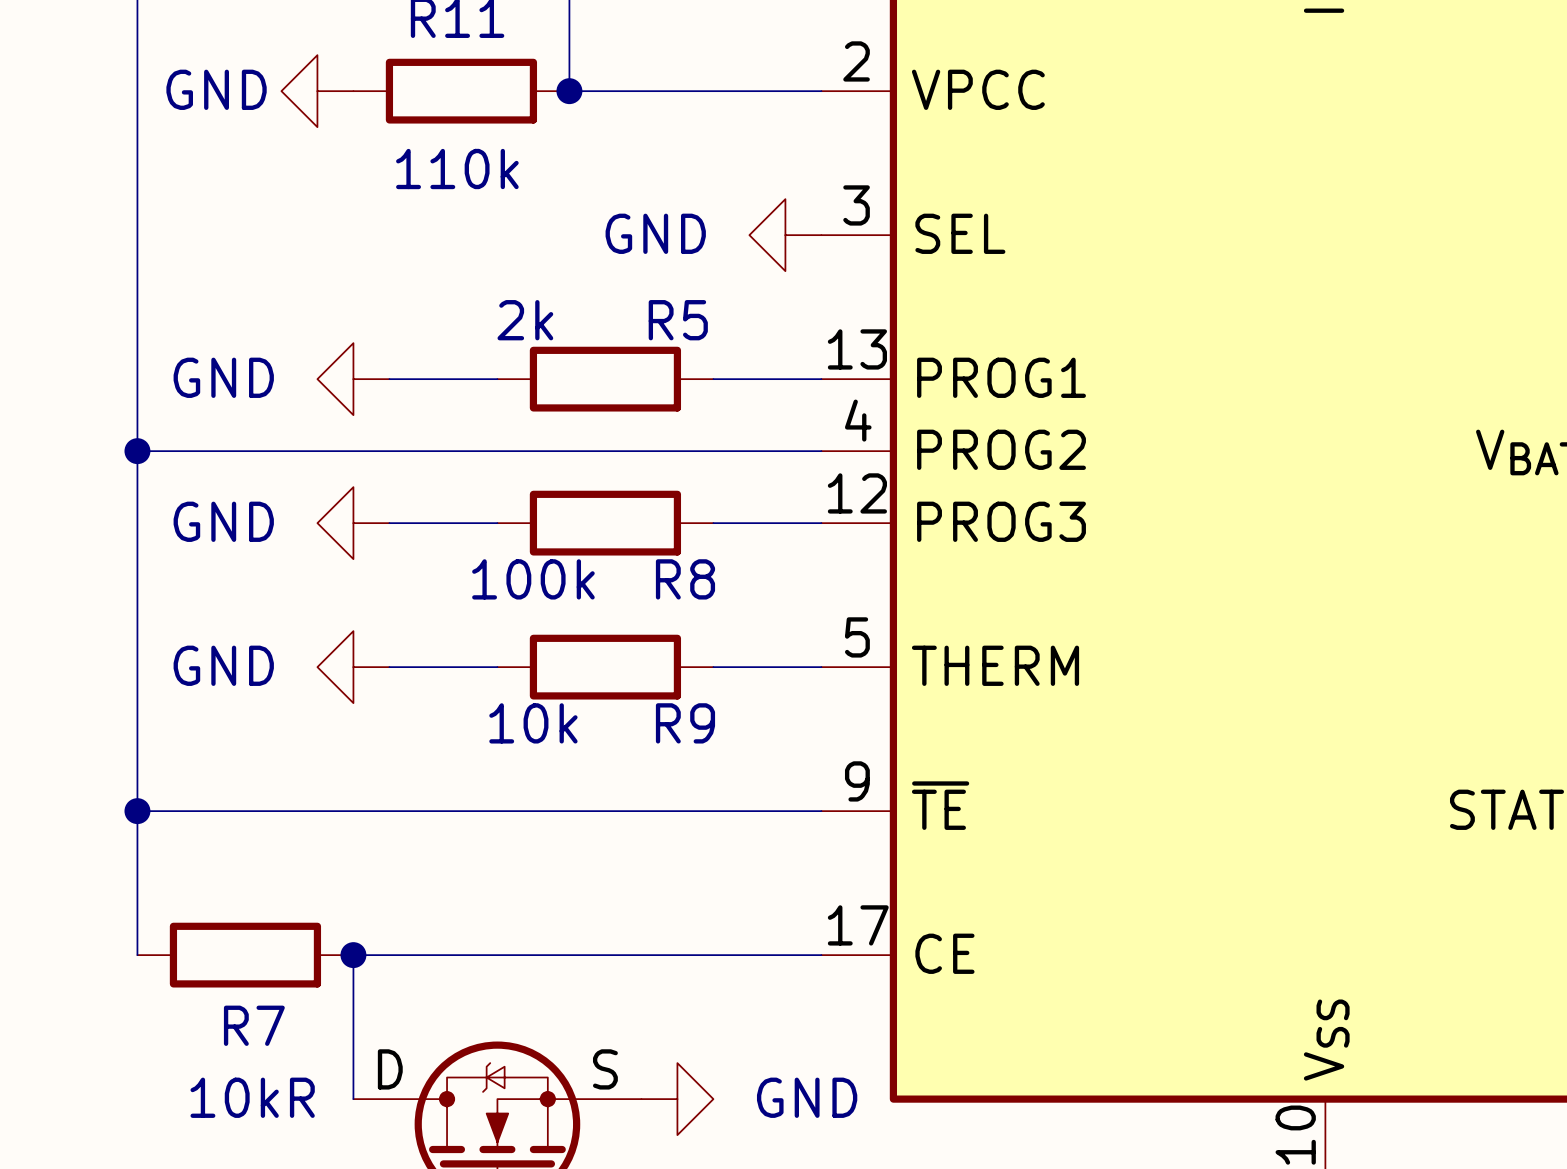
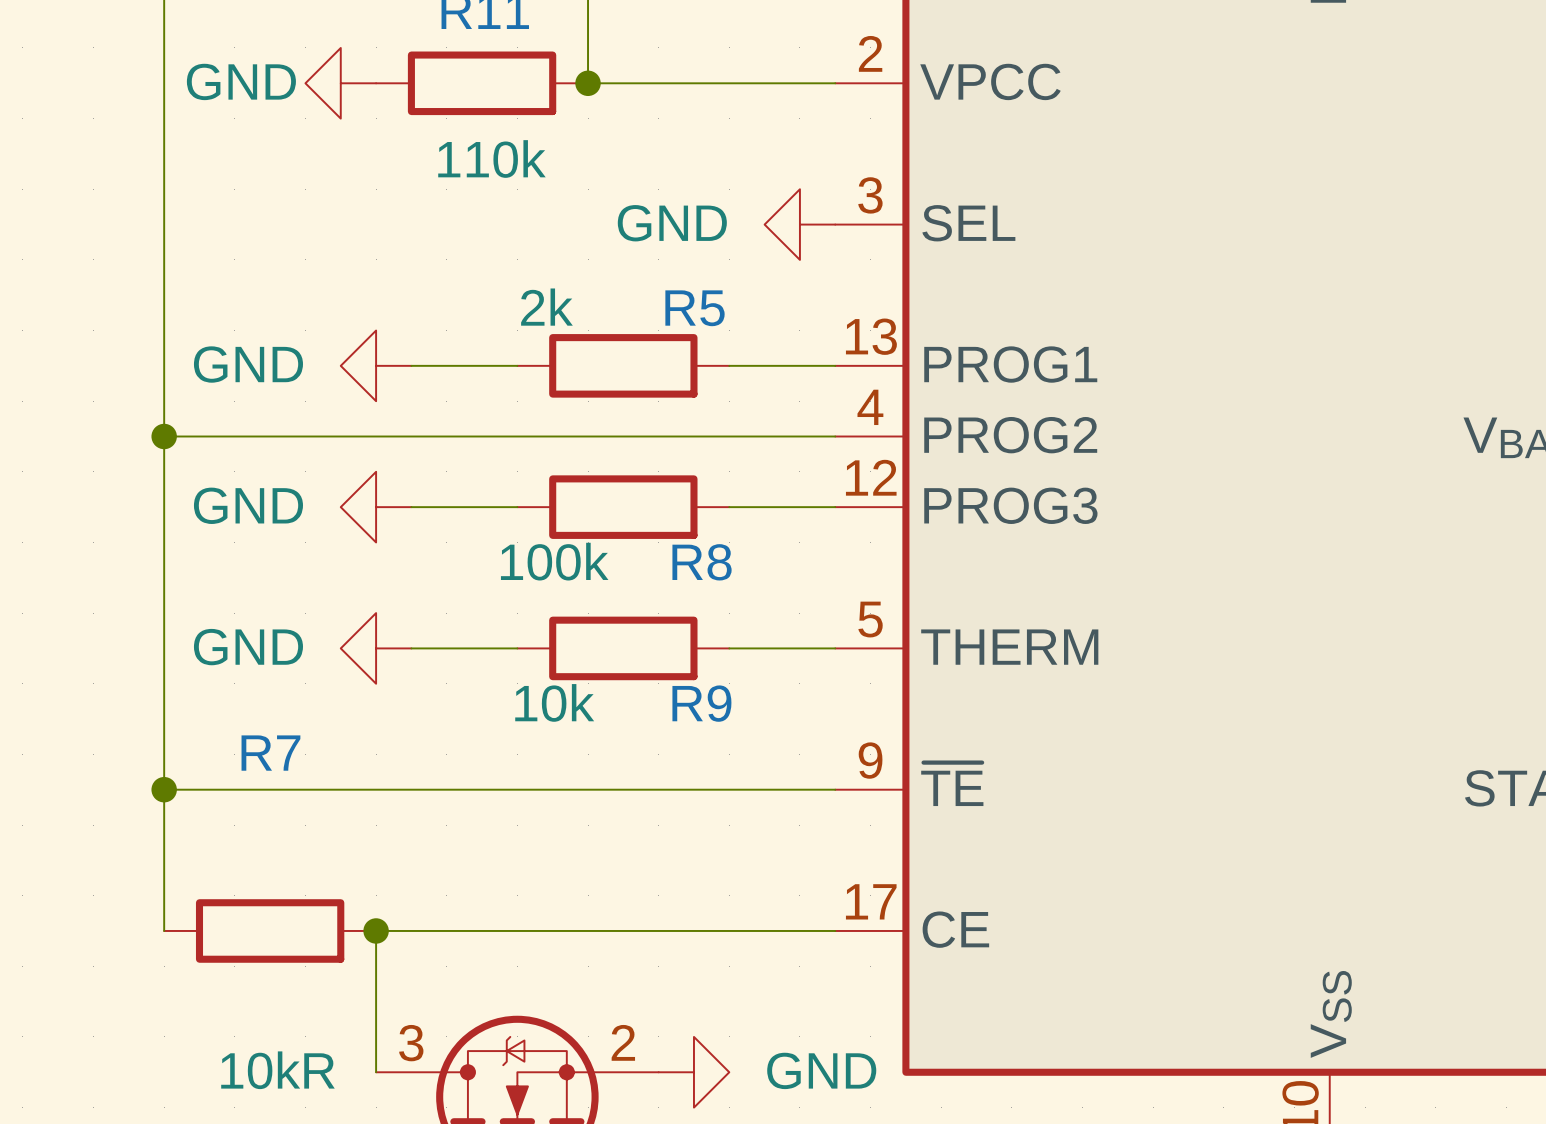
R7 name position: R7 (254, 1025) -> R7 (270, 753)
part pin number: none -> 3 (411, 1043)
part pin name: D (390, 1069) -> none
part pin number: none -> 2 (623, 1042)
part pin name: S (605, 1069) -> none

